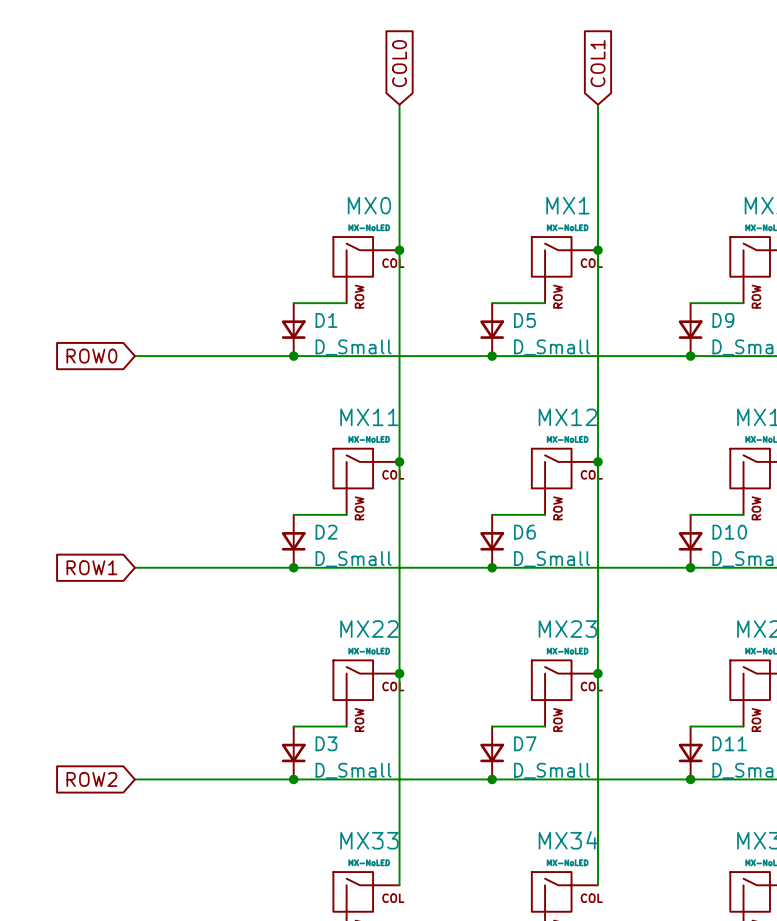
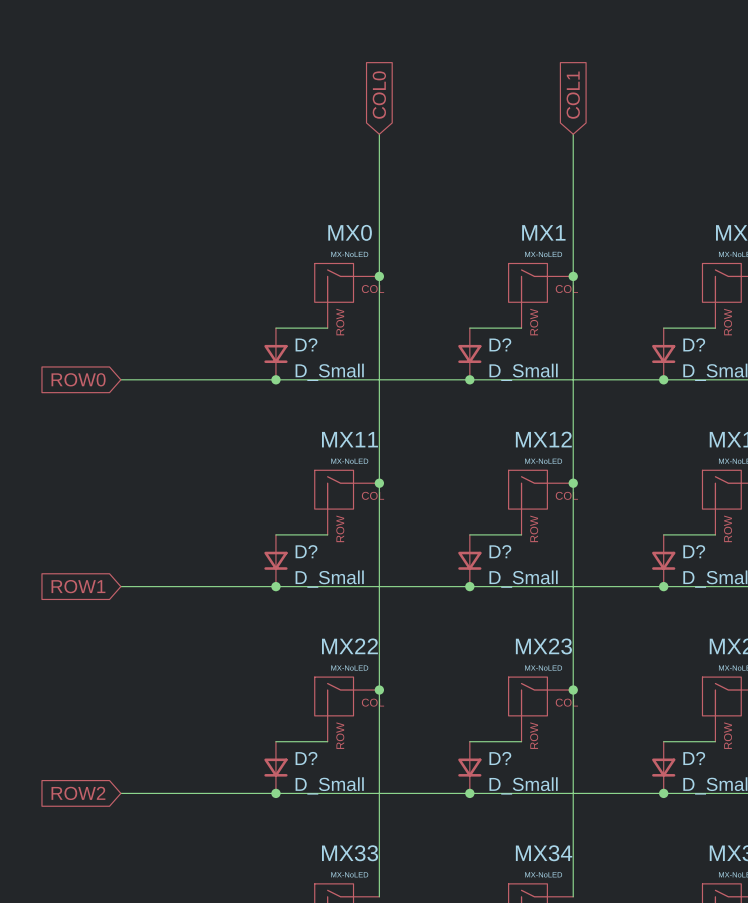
D1 name: D1 (326, 320) -> D? (306, 344)
D5 name: D5 (524, 320) -> D? (500, 344)
D9 name: D9 (723, 320) -> D? (694, 344)
D2 name: D2 (326, 532) -> D? (306, 551)
D6 name: D6 (524, 532) -> D? (500, 551)
D10 name: D10 (729, 532) -> D? (694, 551)
D3 name: D3 (326, 743) -> D? (306, 758)
D7 name: D7 (525, 743) -> D? (500, 758)
D11 name: D11 (729, 743) -> D? (694, 758)

